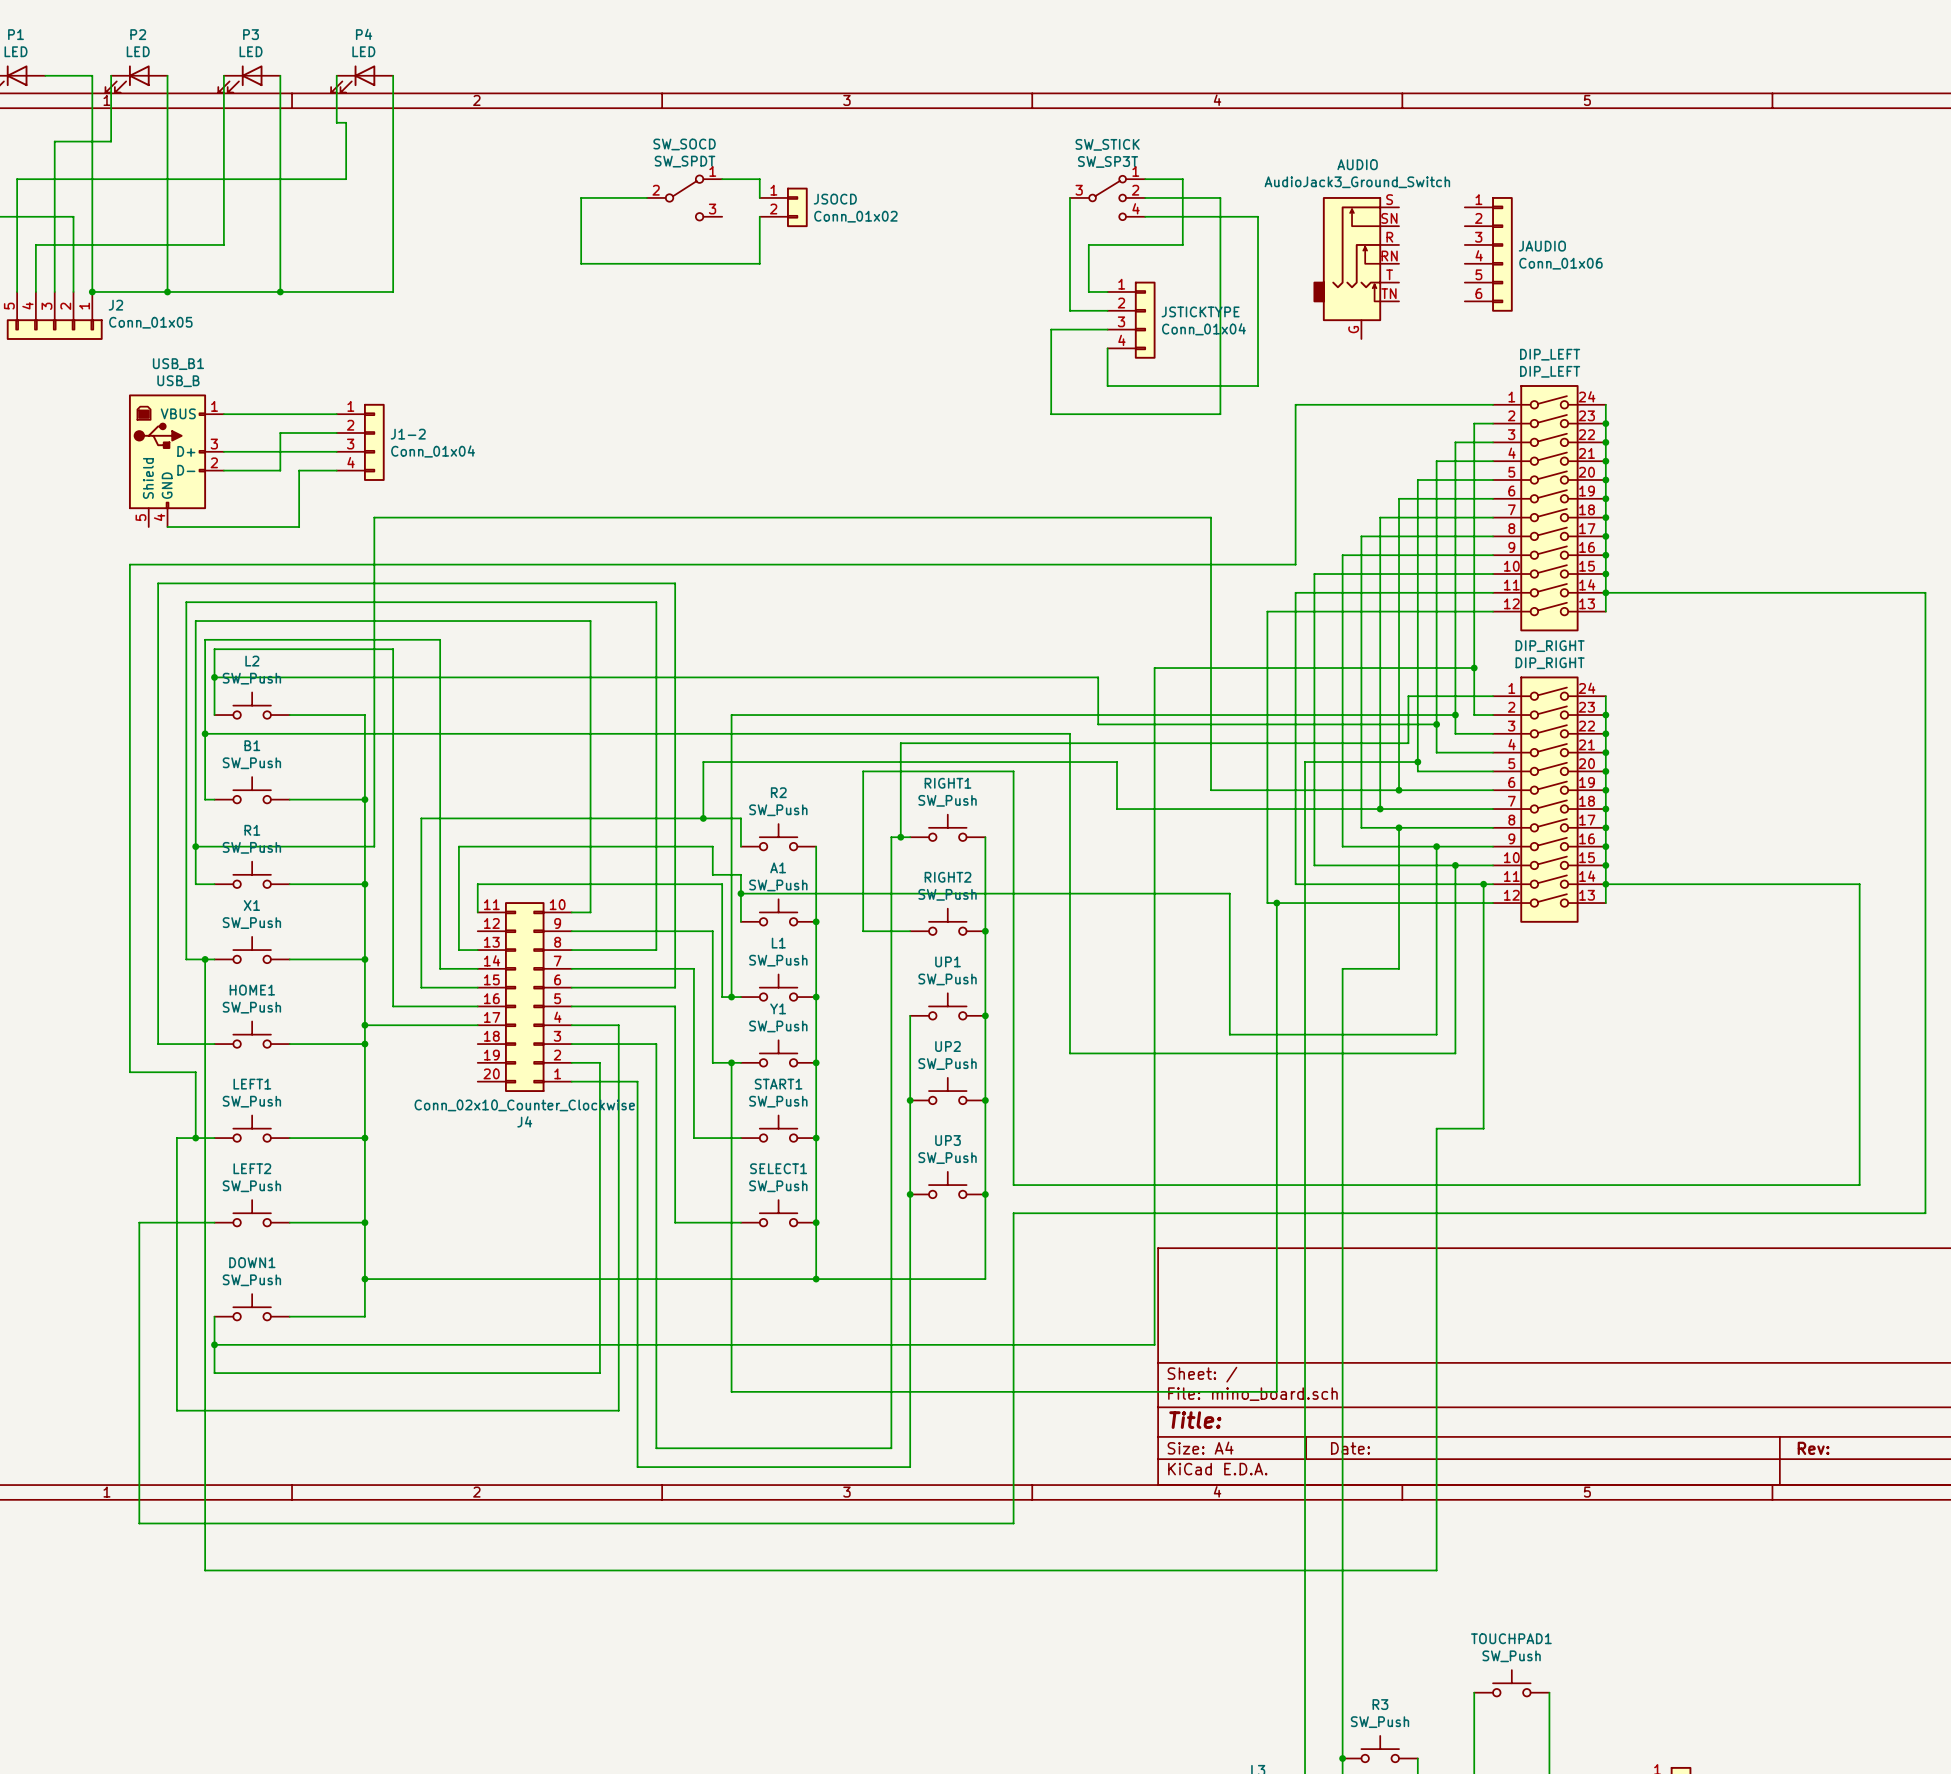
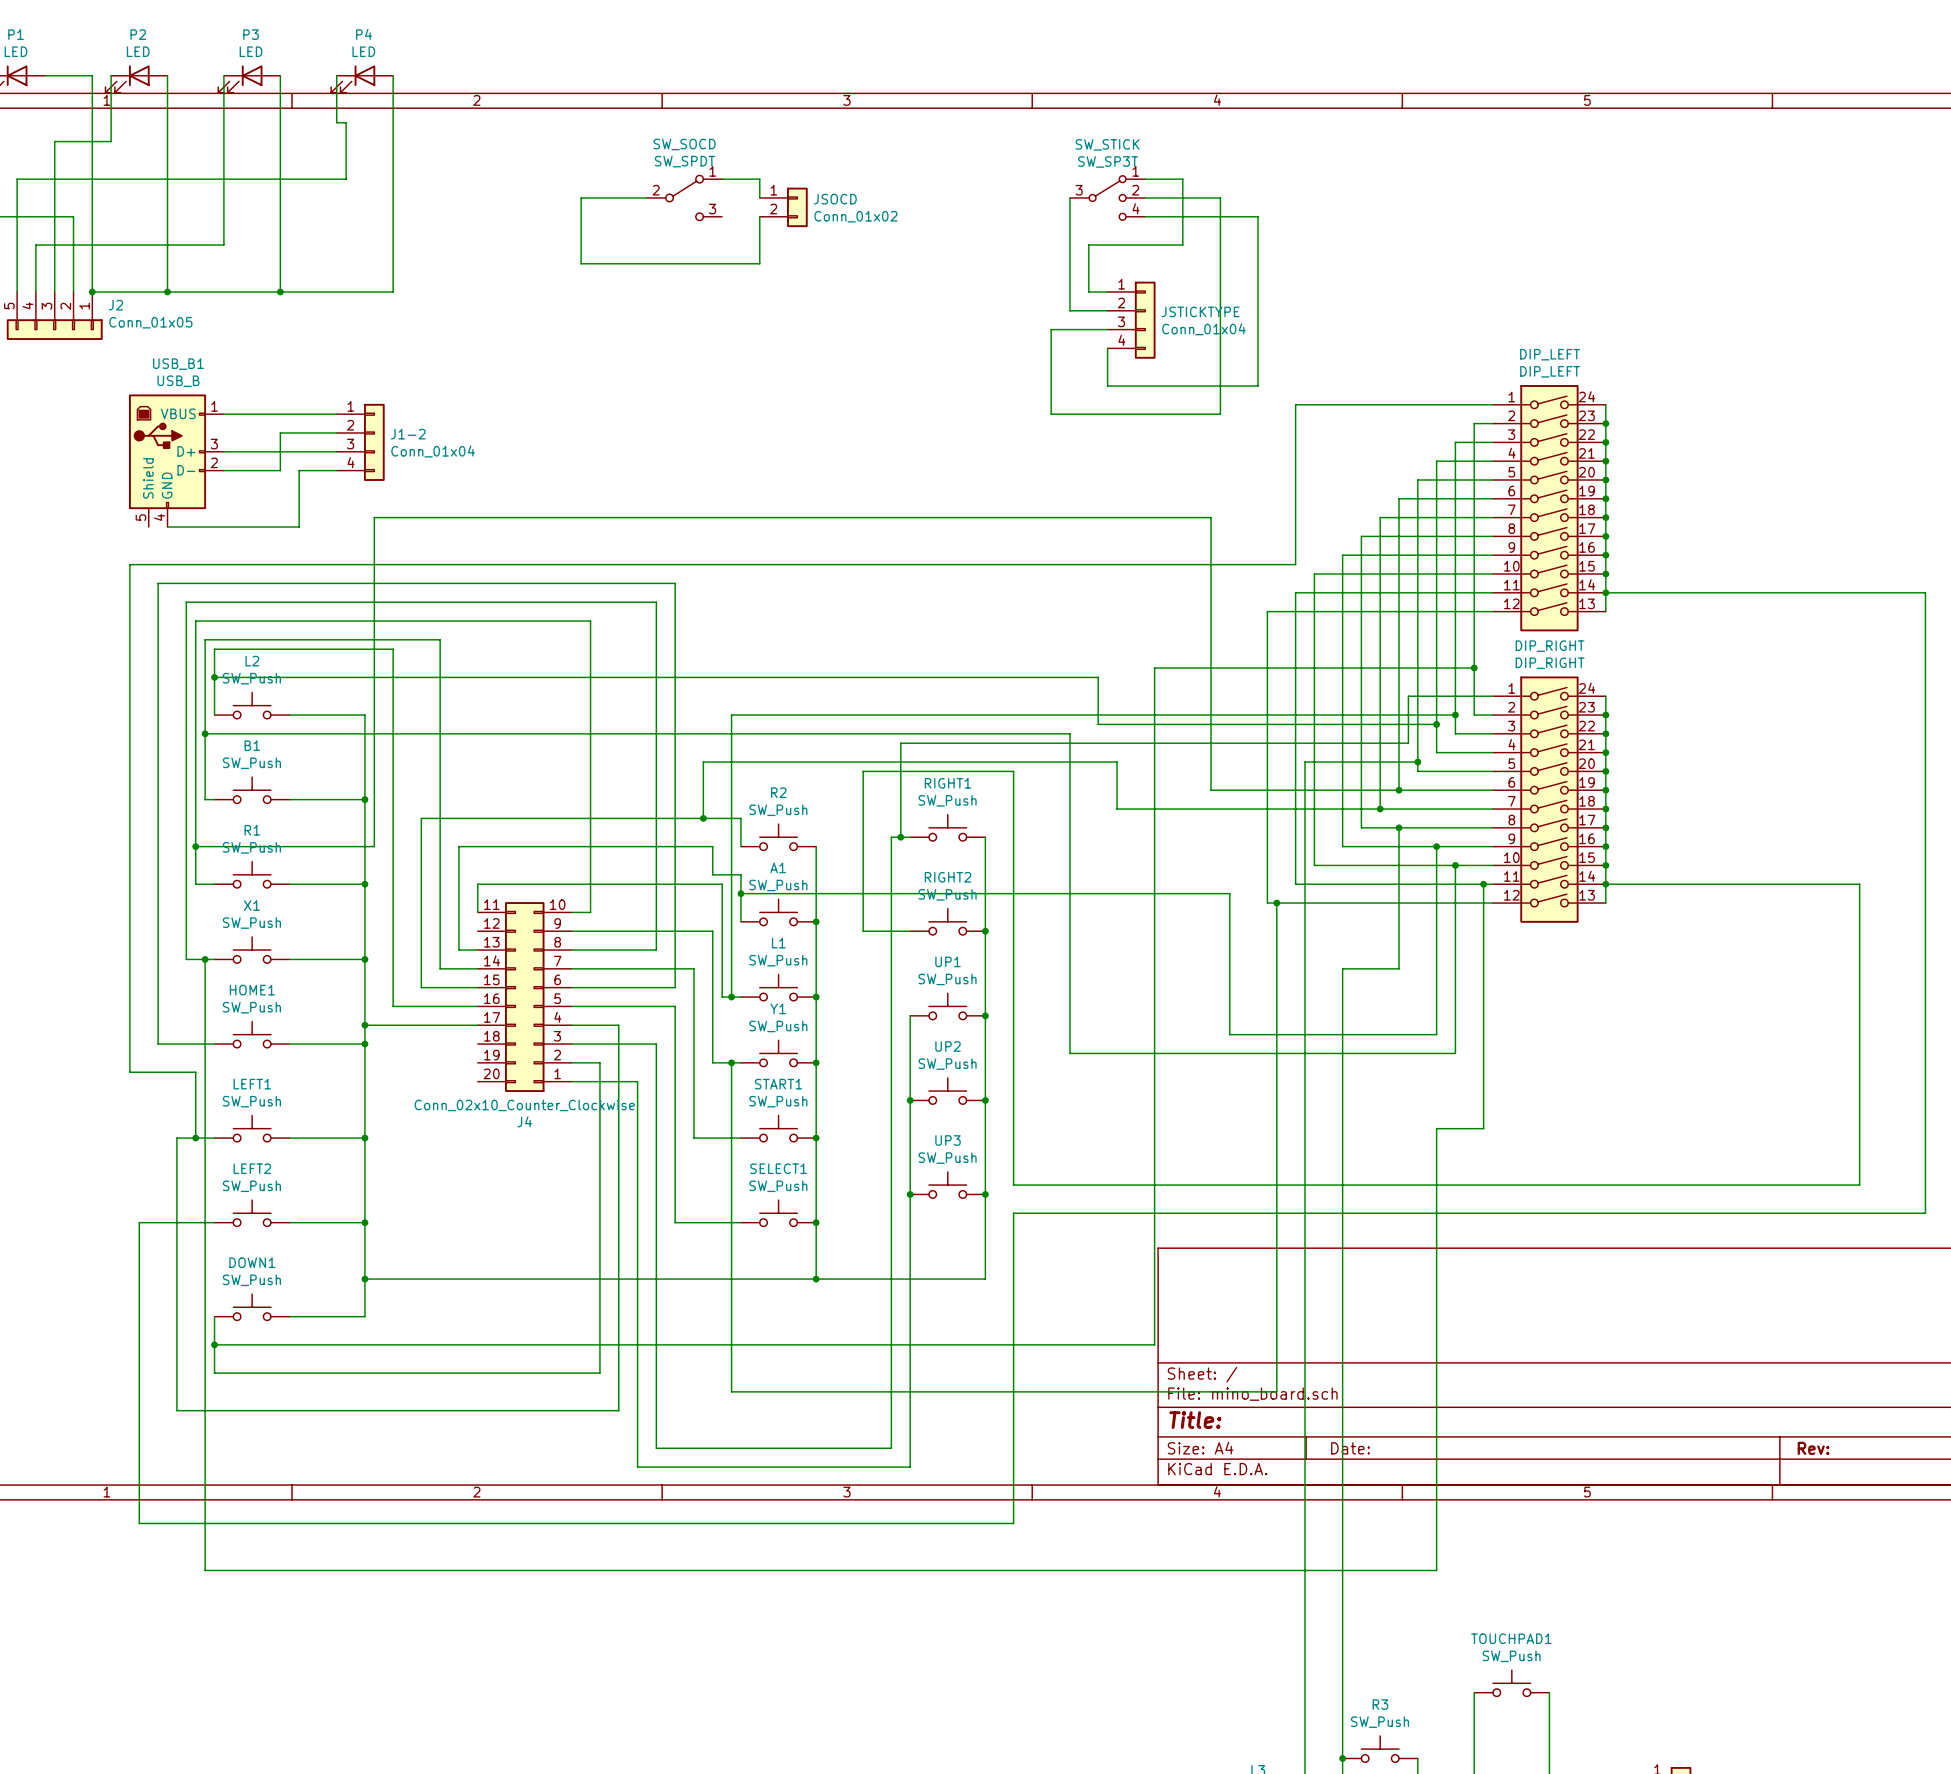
JAUDIO: Conn_01x06 (1488, 254) -> none
AUDIO: AudioJack3_Ground_Switch (1356, 268) -> none

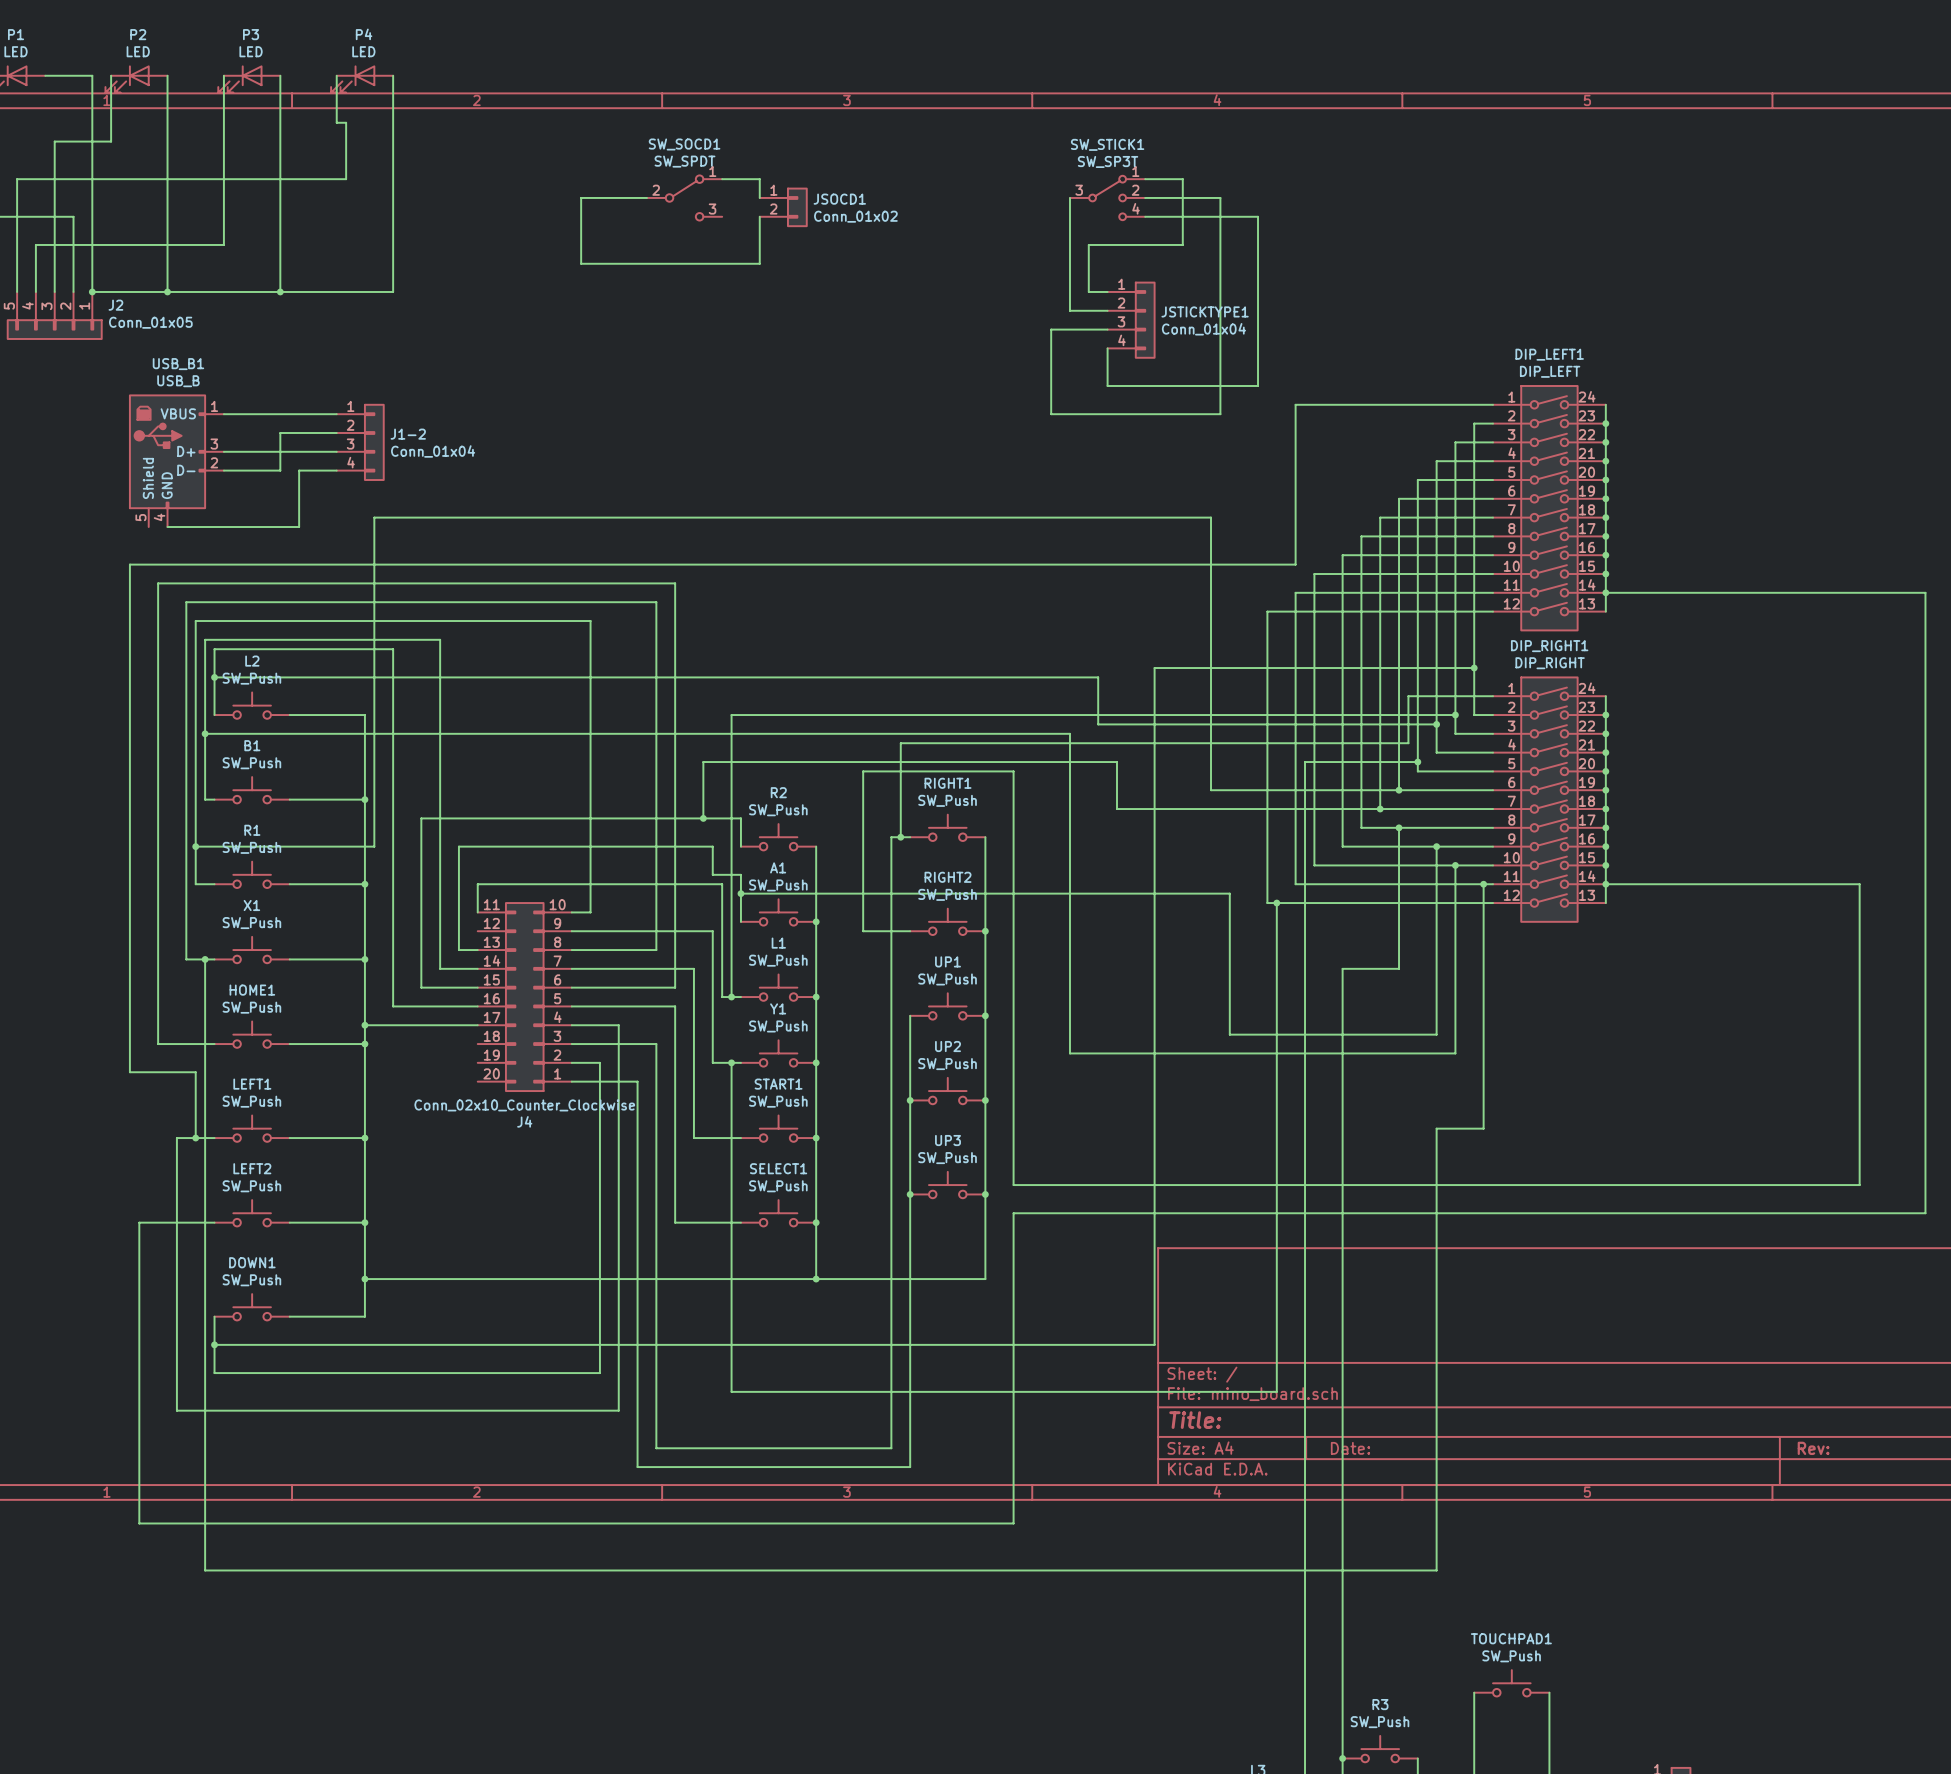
SW_SOCD name: SW_SOCD (684, 144) -> SW_SOCD1 (684, 144)
SW_STICK name: SW_STICK (1107, 144) -> SW_STICK1 (1107, 144)
JSOCD name: JSOCD (835, 199) -> JSOCD1 (839, 199)
JSTICKTYPE name: JSTICKTYPE (1200, 311) -> JSTICKTYPE1 (1205, 311)
DIP_LEFT name: DIP_LEFT (1550, 354) -> DIP_LEFT1 (1549, 354)
DIP_RIGHT name: DIP_RIGHT (1550, 646) -> DIP_RIGHT1 (1549, 646)

